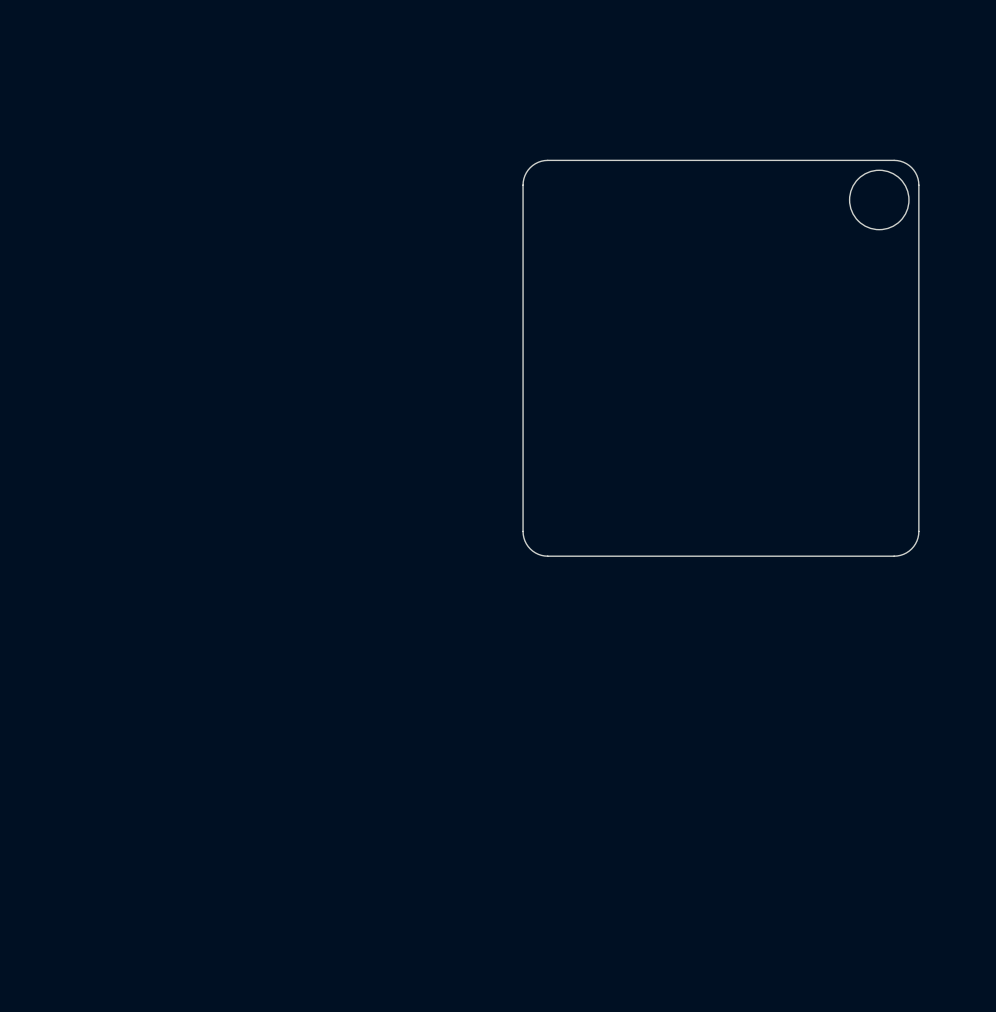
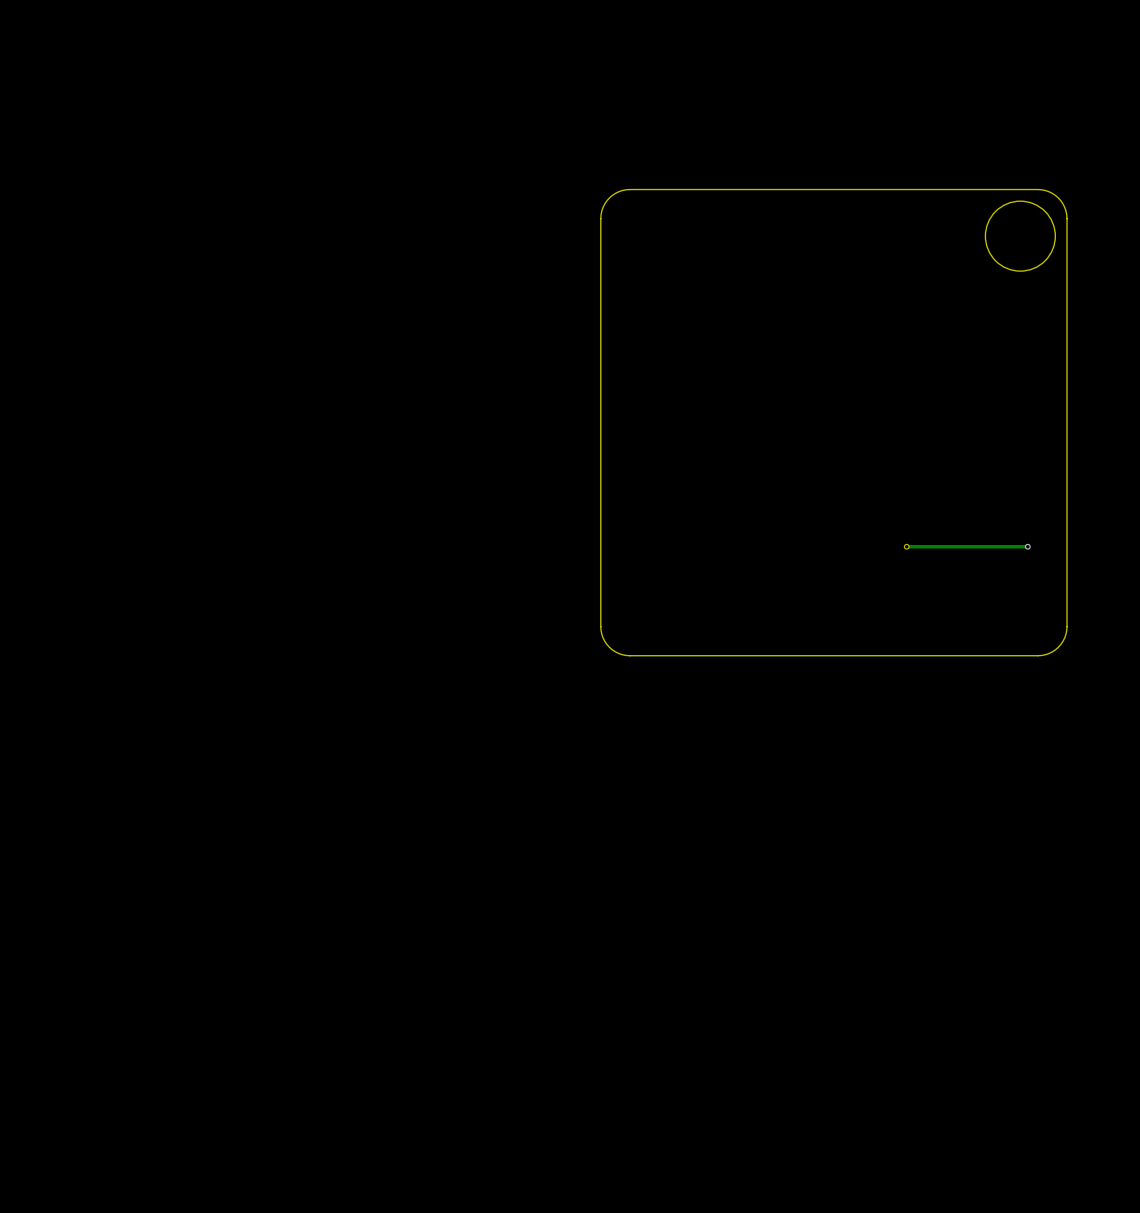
part: none -> (906, 546)
track: none -> (1027, 546) (906, 546)
via: none -> (1027, 546)

